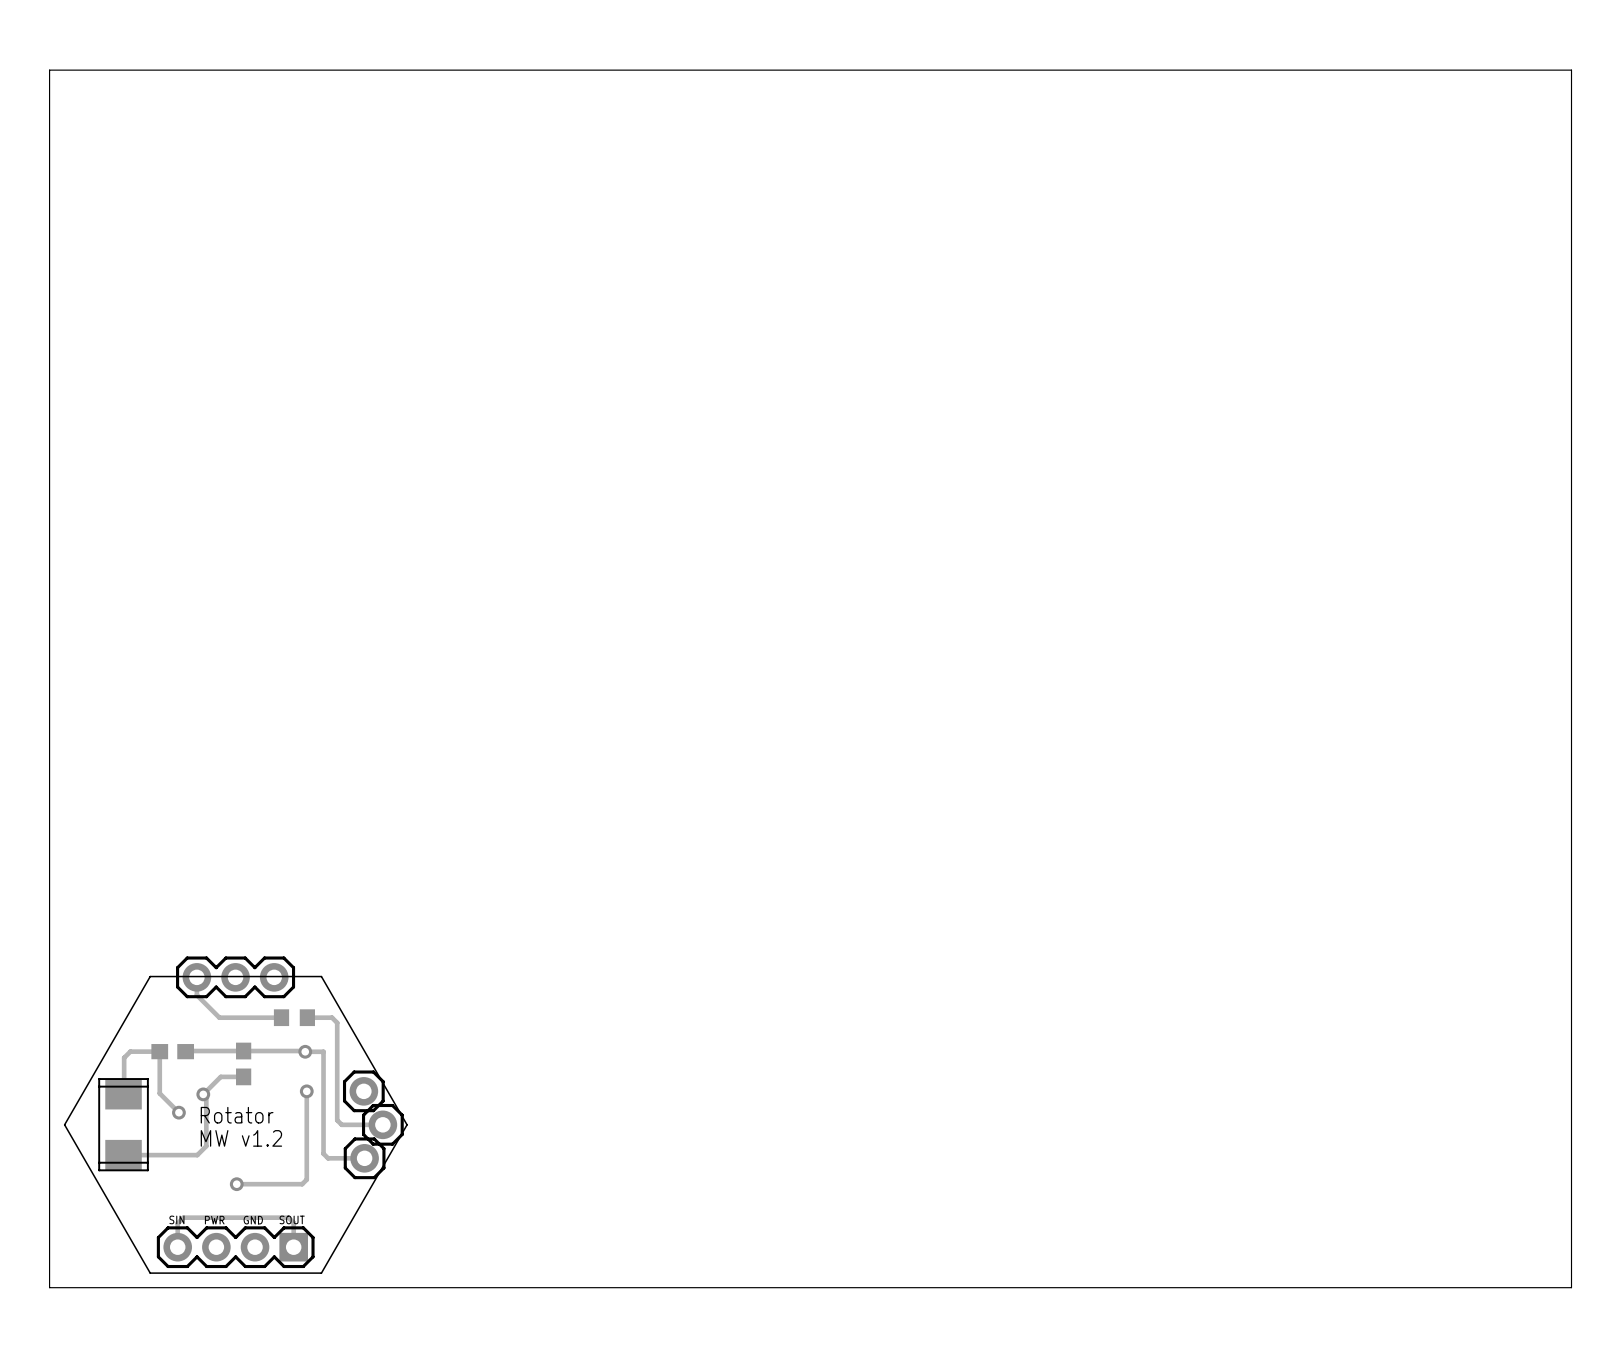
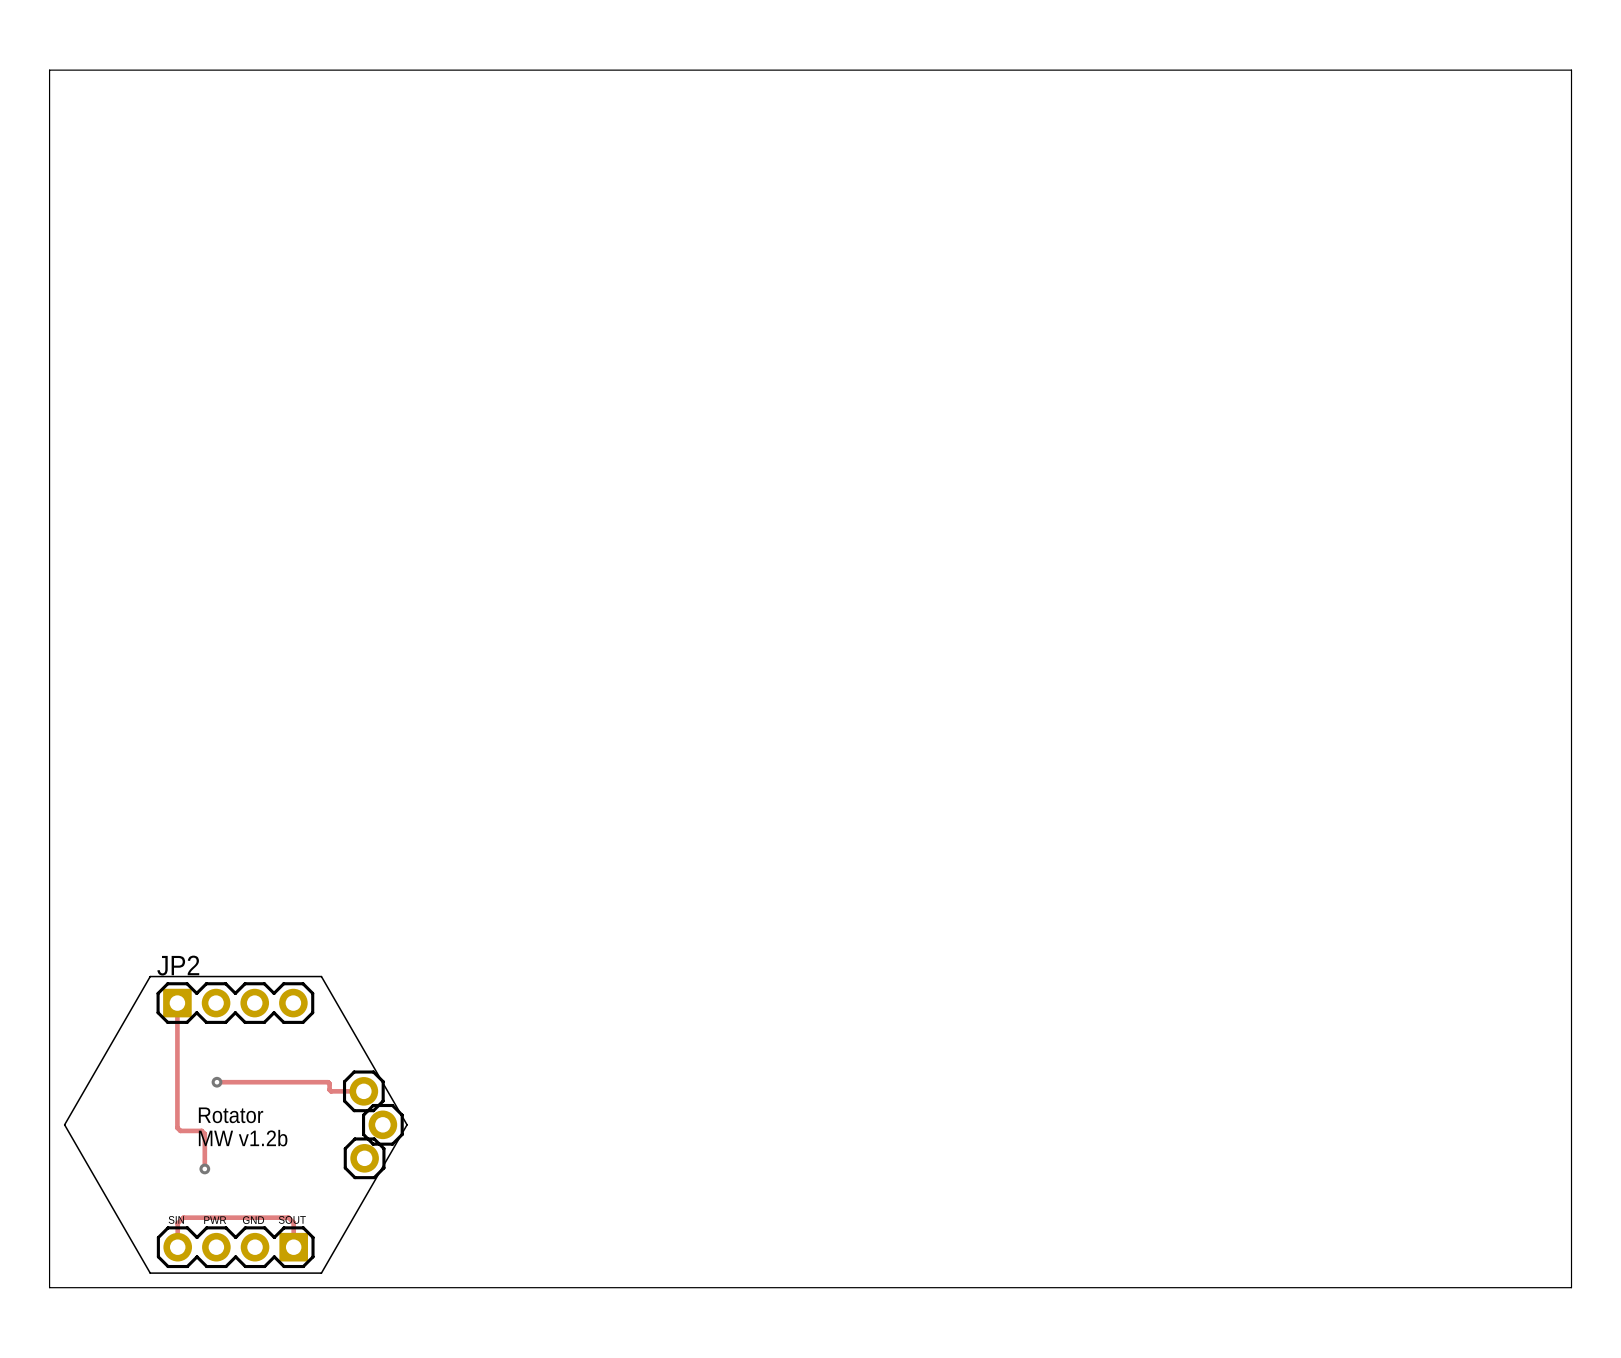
track: (196, 977) (196, 995) (219, 1017) (281, 1017) -> none
part: (235, 977) -> none
track: none -> (177, 1003) (177, 1127) (180, 1130) (201, 1130) (204, 1133) (204, 1168)
JP2: none -> (235, 1003)
part: (294, 1017) -> none
track: (307, 1017) (332, 1017) (337, 1022) (337, 1120) (341, 1124) (382, 1124) -> none
part: (172, 1051) -> none
track: (185, 1051) (323, 1051) (323, 1153) (328, 1158) (364, 1158) -> none
via: (305, 1051) -> none
part: (243, 1063) -> none
track: (243, 1076) (220, 1076) (203, 1094) (206, 1097) (206, 1146) (197, 1155) (123, 1155) -> none
track: none -> (216, 1082) (328, 1082) (331, 1091) (363, 1091)
via: none -> (216, 1082)
track: (306, 1091) (306, 1179) (302, 1184) (236, 1184) -> none
via: (306, 1091) -> none
track: (123, 1094) (124, 1057) (130, 1051) (159, 1051) (159, 1093) (178, 1112) -> none
via: (203, 1094) -> none
via: (178, 1112) -> none
part: (123, 1124) -> none
text: MW v1.2 (241, 1138) -> MW v1.2b (243, 1138)
via: none -> (204, 1168)
via: (236, 1184) -> none

